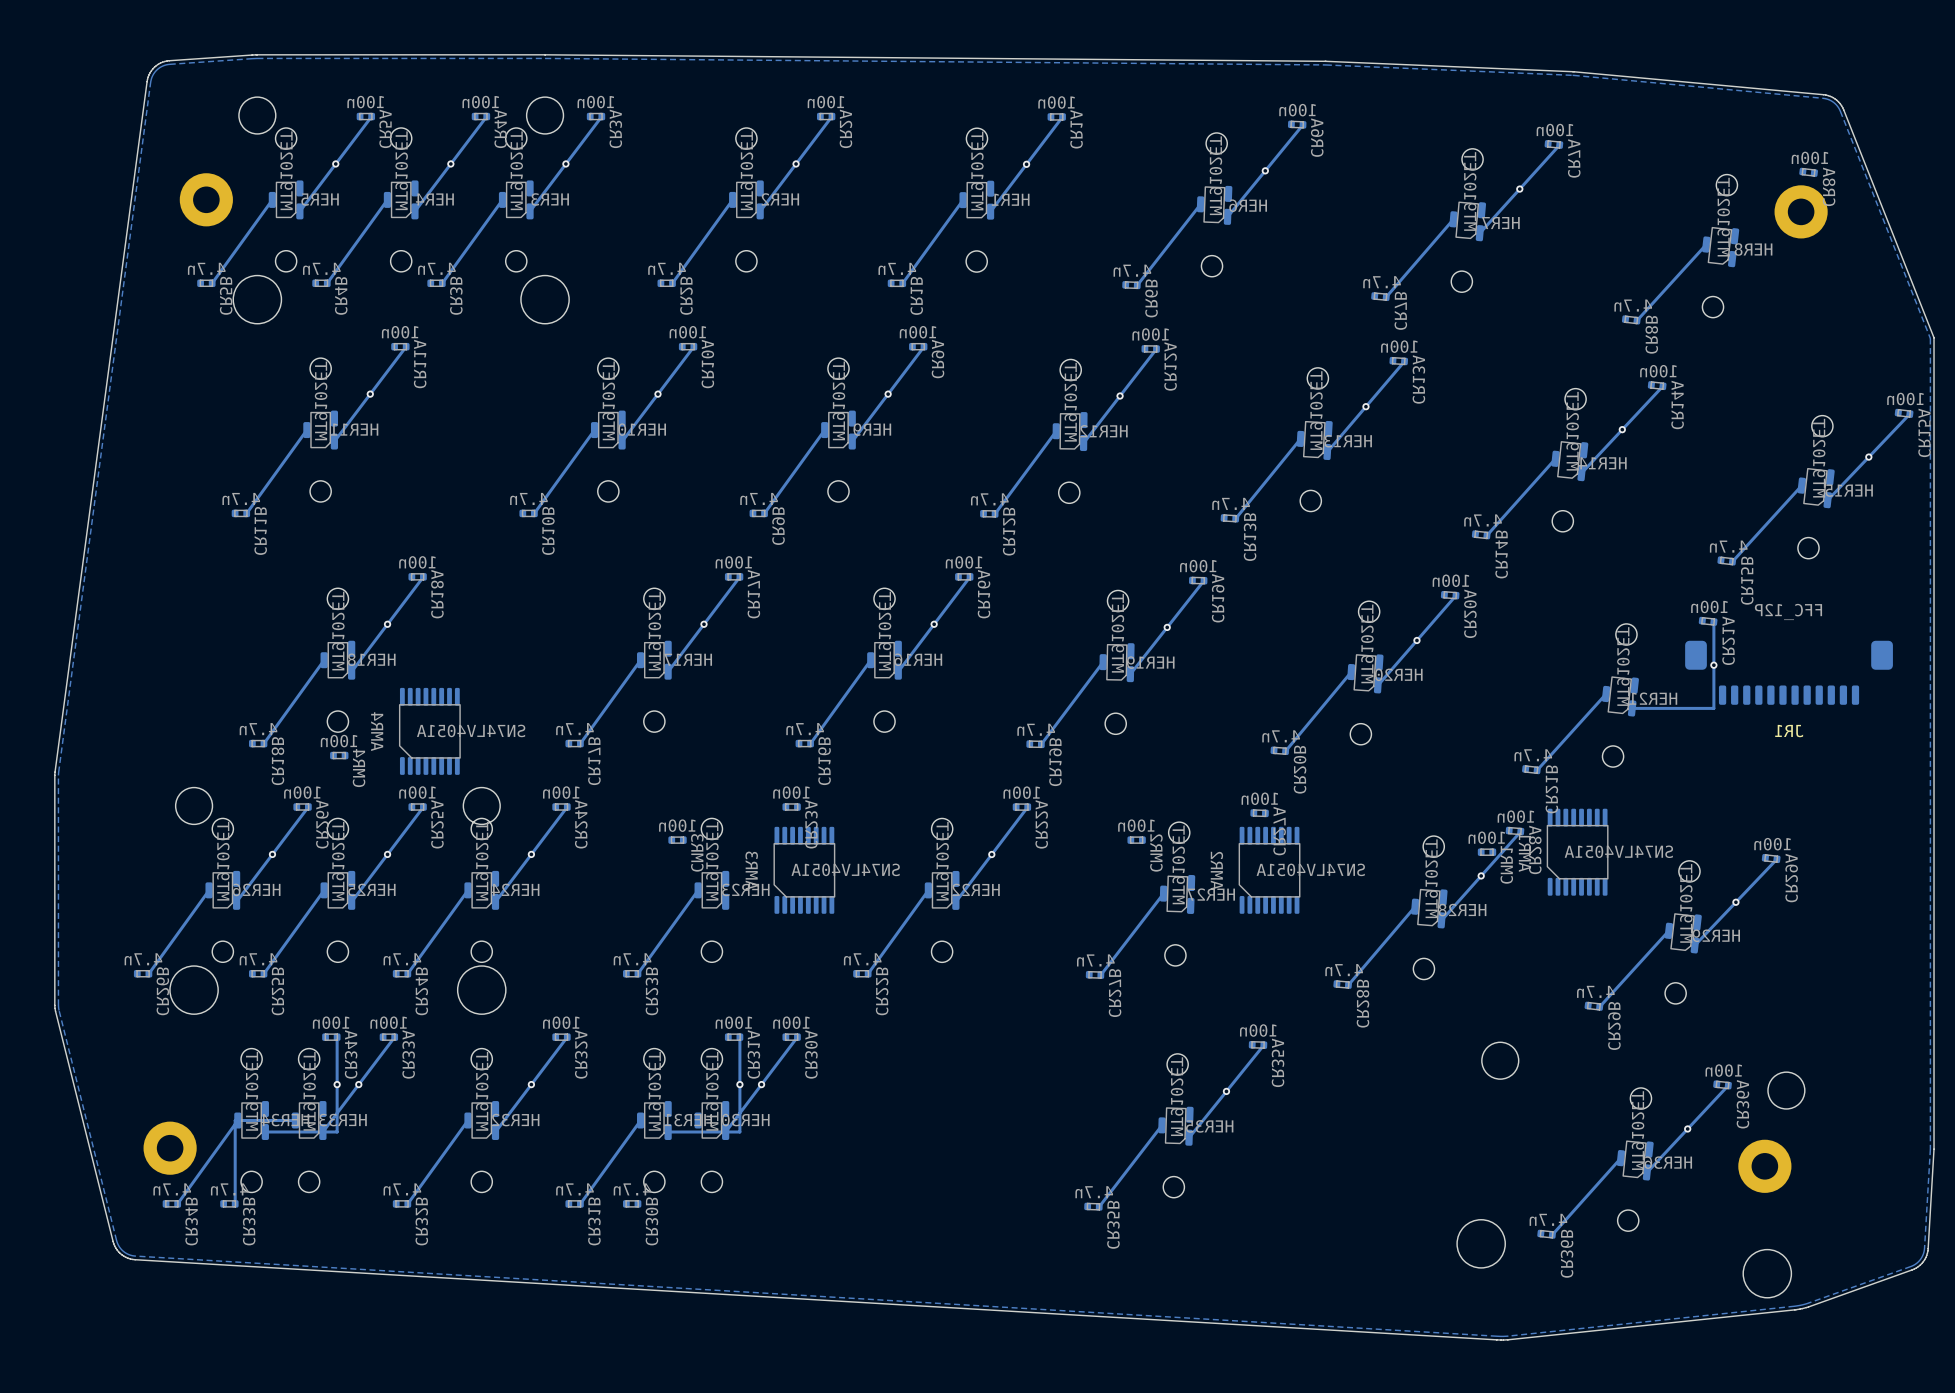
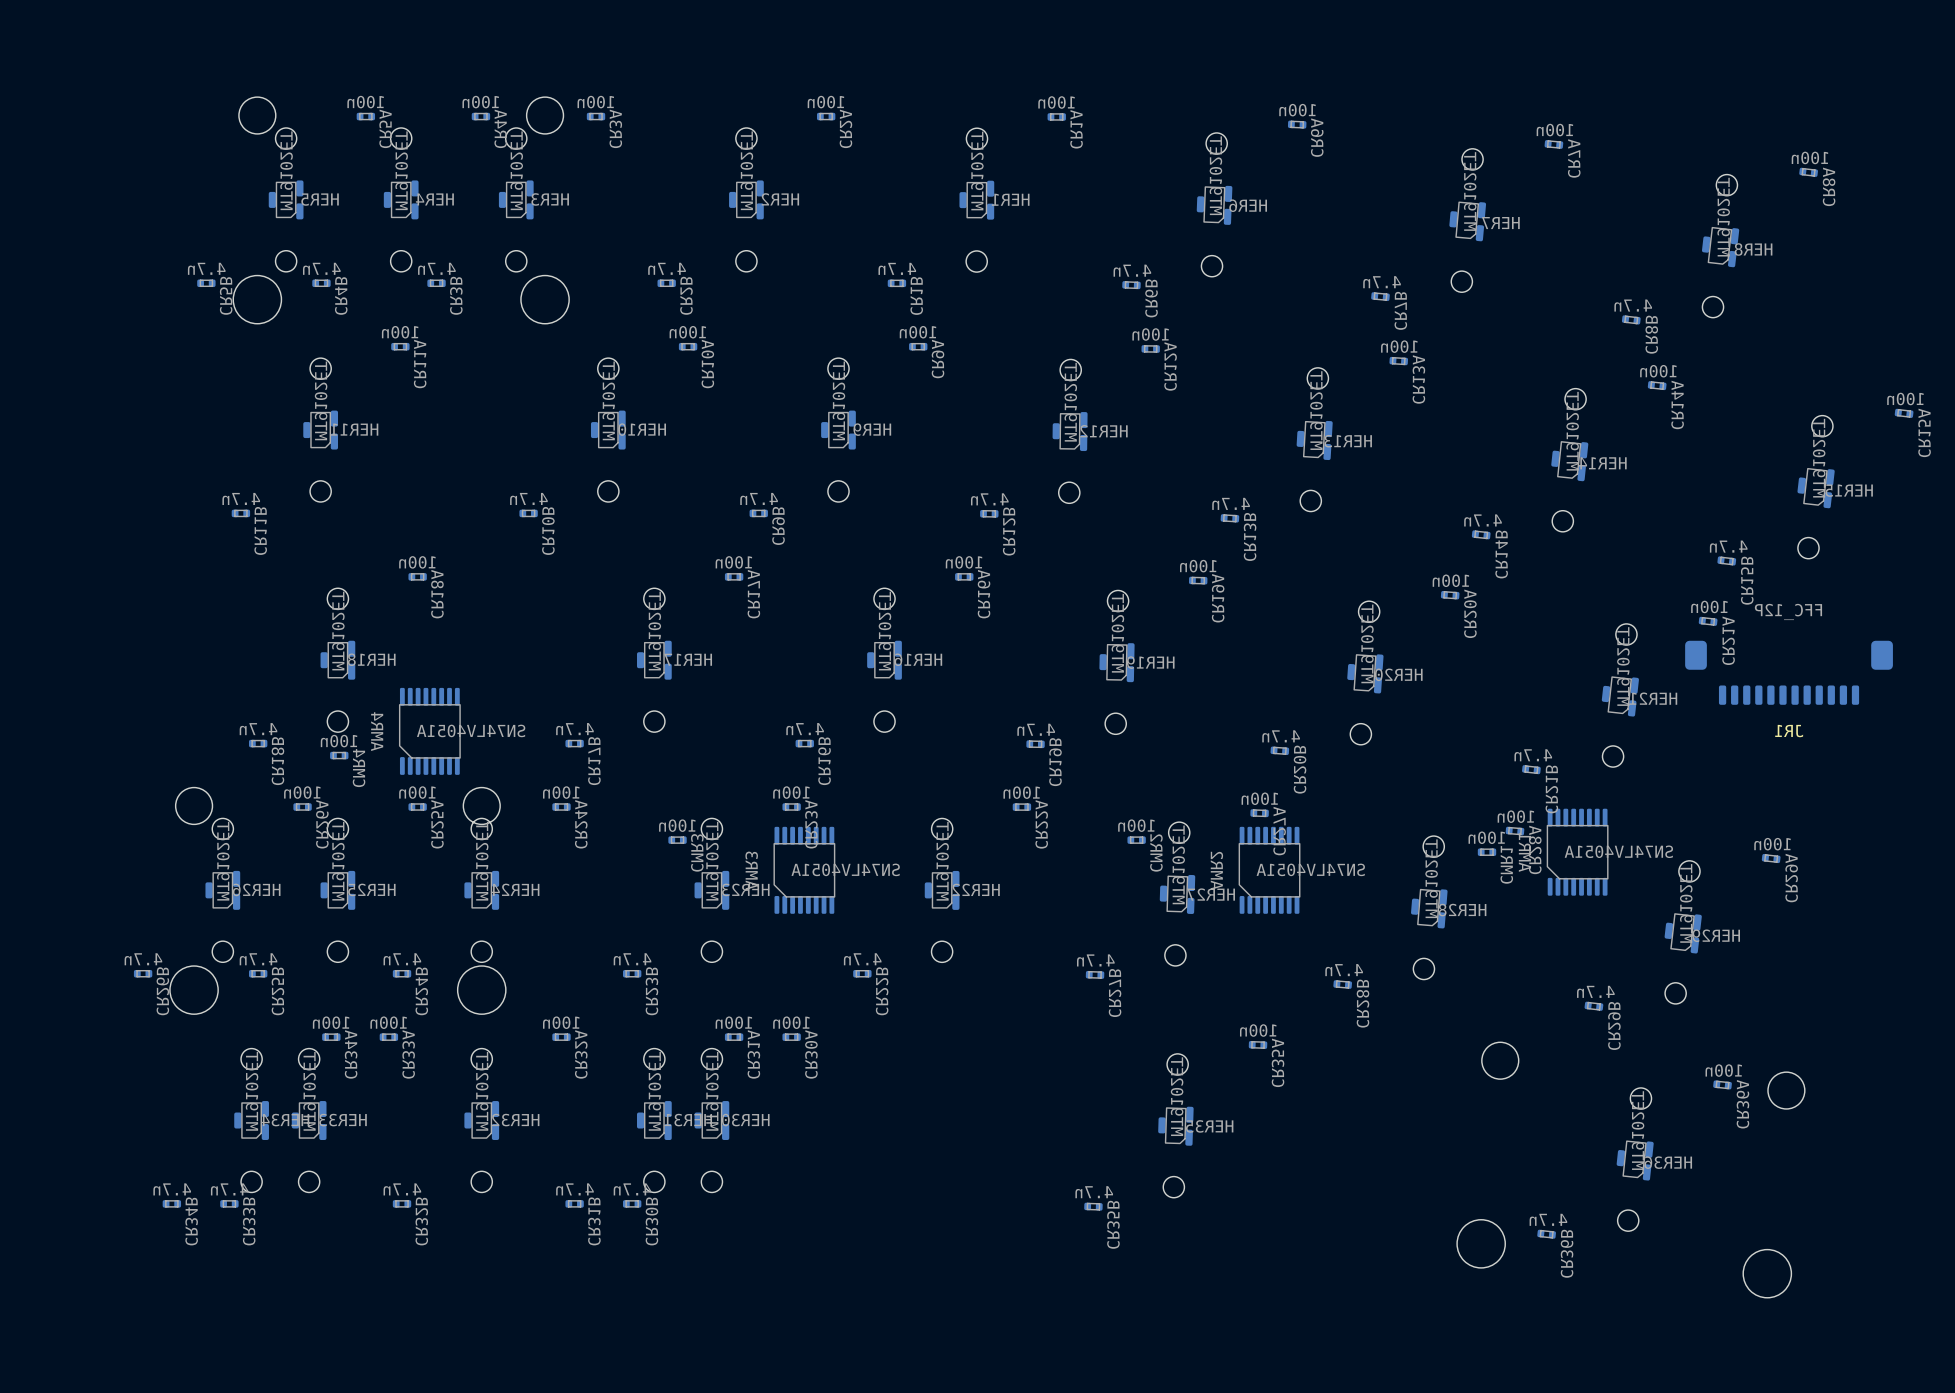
board edge: (545, 54) (1325, 61) (1573, 71) (1823, 94) (1836, 100) (1843, 109) (1934, 337) (1934, 1149) (1928, 1248) (1921, 1263) (1912, 1269) (1800, 1309) (1501, 1340) (135, 1259) (120, 1253) (113, 1241) (55, 1008) (54, 775) (148, 77) (154, 67) (167, 61) (252, 55) (545, 54) -> none
zone outline: (545, 58) (1325, 64) (1573, 75) (1823, 98) (1834, 102) (1840, 111) (1930, 338) (1930, 1149) (1924, 1248) (1919, 1261) (1910, 1266) (1799, 1305) (1501, 1336) (135, 1256) (122, 1250) (116, 1240) (58, 1007) (58, 775) (151, 78) (158, 68) (167, 64) (252, 58) (545, 58) -> none
track: (371, 116) (299, 211) -> none
track: (486, 116) (414, 211) -> none
track: (601, 116) (530, 211) -> none
track: (831, 116) (760, 211) -> none
track: (1062, 116) (990, 211) -> none
track: (1303, 124) (1227, 216) -> none
track: (1559, 144) (1479, 233) -> none
via: (335, 163) -> none
via: (450, 163) -> none
via: (565, 163) -> none
via: (796, 163) -> none
via: (1026, 164) -> none
via: (1265, 170) -> none
via: (1519, 189) -> none
part: (206, 199) -> none
track: (272, 199) (212, 283) -> none
track: (387, 199) (327, 283) -> none
track: (502, 199) (442, 283) -> none
track: (732, 199) (672, 283) -> none
track: (963, 200) (902, 283) -> none
track: (1200, 204) (1137, 285) -> none
part: (1801, 211) -> none
track: (1453, 219) (1386, 297) -> none
track: (1706, 244) (1637, 320) -> none
track: (406, 346) (334, 441) -> none
track: (693, 346) (622, 441) -> none
track: (924, 346) (852, 441) -> none
track: (1156, 349) (1083, 443) -> none
track: (1404, 361) (1327, 451) -> none
track: (1662, 386) (1581, 473) -> none
via: (370, 394) -> none
via: (657, 394) -> none
via: (888, 394) -> none
via: (1120, 396) -> none
via: (1365, 406) -> none
track: (1909, 414) (1827, 500) -> none
via: (1622, 429) -> none
track: (306, 430) (246, 513) -> none
track: (594, 430) (534, 513) -> none
track: (824, 430) (764, 513) -> none
track: (1056, 431) (995, 513) -> none
track: (1300, 438) (1235, 518) -> none
via: (1868, 457) -> none
track: (1555, 458) (1486, 535) -> none
track: (1801, 485) (1732, 561) -> none
track: (423, 576) (351, 671) -> none
track: (739, 576) (668, 671) -> none
track: (970, 576) (898, 671) -> none
track: (1204, 580) (1130, 674) -> none
track: (1455, 595) (1377, 685) -> none
track: (1713, 621) (1713, 708) (1632, 708) -> none
via: (387, 624) -> none
via: (704, 624) -> none
via: (934, 624) -> none
via: (1167, 627) -> none
via: (1416, 640) -> none
track: (324, 660) (263, 743) -> none
track: (640, 660) (580, 743) -> none
track: (870, 660) (810, 743) -> none
track: (1103, 662) (1041, 744) -> none
via: (1713, 665) -> none
track: (1351, 672) (1285, 751) -> none
track: (1606, 694) (1537, 770) -> none
track: (308, 807) (236, 901) -> none
track: (423, 807) (351, 901) -> none
track: (567, 807) (495, 901) -> none
track: (1027, 807) (955, 901) -> none
track: (1520, 831) (1441, 920) -> none
via: (272, 854) -> none
via: (387, 854) -> none
via: (531, 854) -> none
via: (991, 854) -> none
track: (1776, 859) (1694, 945) -> none
via: (1481, 875) -> none
track: (209, 890) (148, 973) -> none
track: (324, 890) (263, 973) -> none
track: (468, 890) (407, 973) -> none
track: (698, 890) (637, 973) -> none
track: (928, 890) (868, 973) -> none
track: (1163, 893) (1100, 975) -> none
via: (1735, 902) -> none
track: (1415, 906) (1348, 984) -> none
track: (1668, 930) (1599, 1006) -> none
track: (337, 1037) (337, 1131) (265, 1131) -> none
track: (394, 1037) (322, 1131) -> none
track: (567, 1037) (495, 1131) -> none
track: (739, 1037) (739, 1131) (668, 1131) -> none
track: (797, 1037) (725, 1131) -> none
track: (1263, 1045) (1189, 1137) -> none
via: (337, 1084) -> none
via: (358, 1084) -> none
via: (531, 1084) -> none
via: (739, 1084) -> none
via: (761, 1084) -> none
track: (1728, 1085) (1647, 1172) -> none
via: (1226, 1091) -> none
track: (237, 1120) (177, 1203) -> none
track: (295, 1120) (235, 1120) (235, 1203) -> none
track: (468, 1120) (407, 1203) -> none
track: (640, 1120) (580, 1203) -> none
track: (1162, 1125) (1099, 1206) -> none
via: (1687, 1128) -> none
part: (170, 1148) -> none
track: (1620, 1158) (1552, 1234) -> none
part: (1764, 1166) -> none

